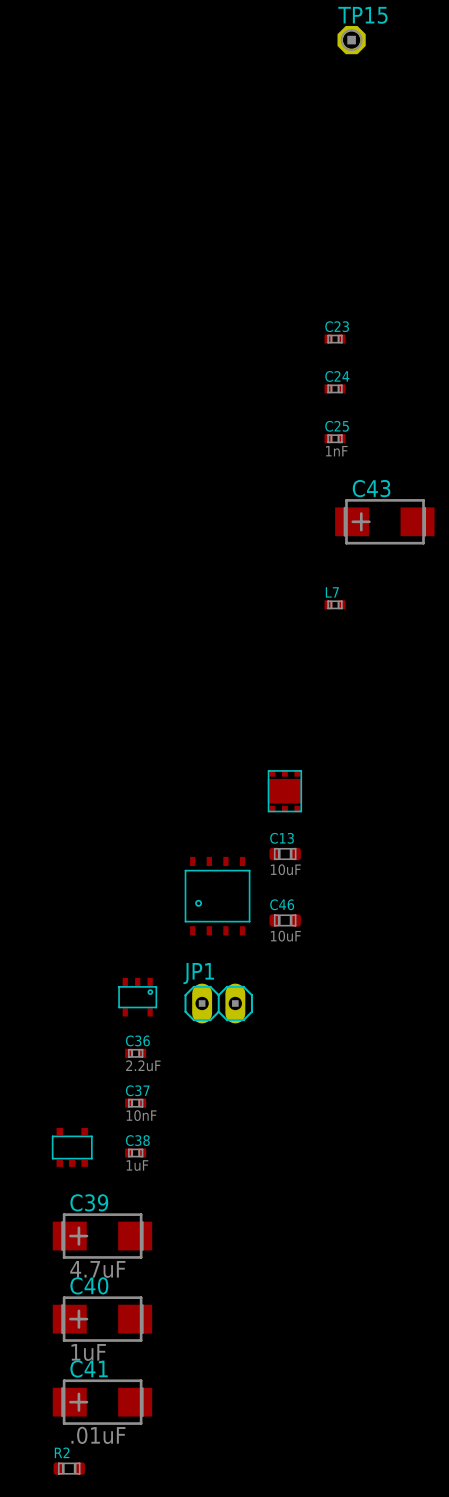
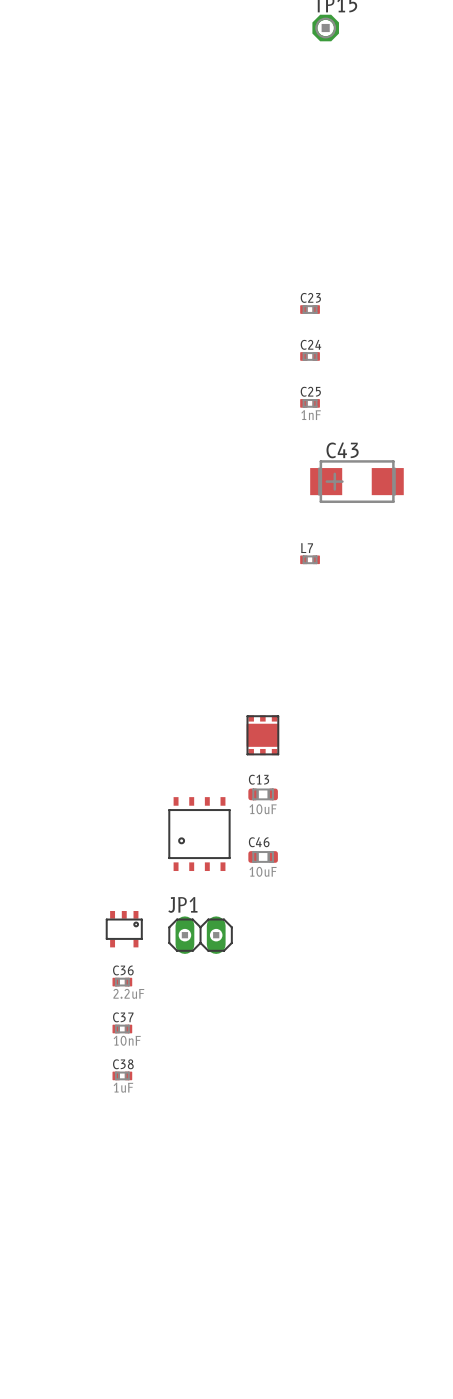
part: (72, 1147) -> none
C39: 4.7uF (102, 1236) -> none
C40: 1uF (102, 1319) -> none
C41: .01uF (102, 1402) -> none
R2: (69, 1468) -> none

